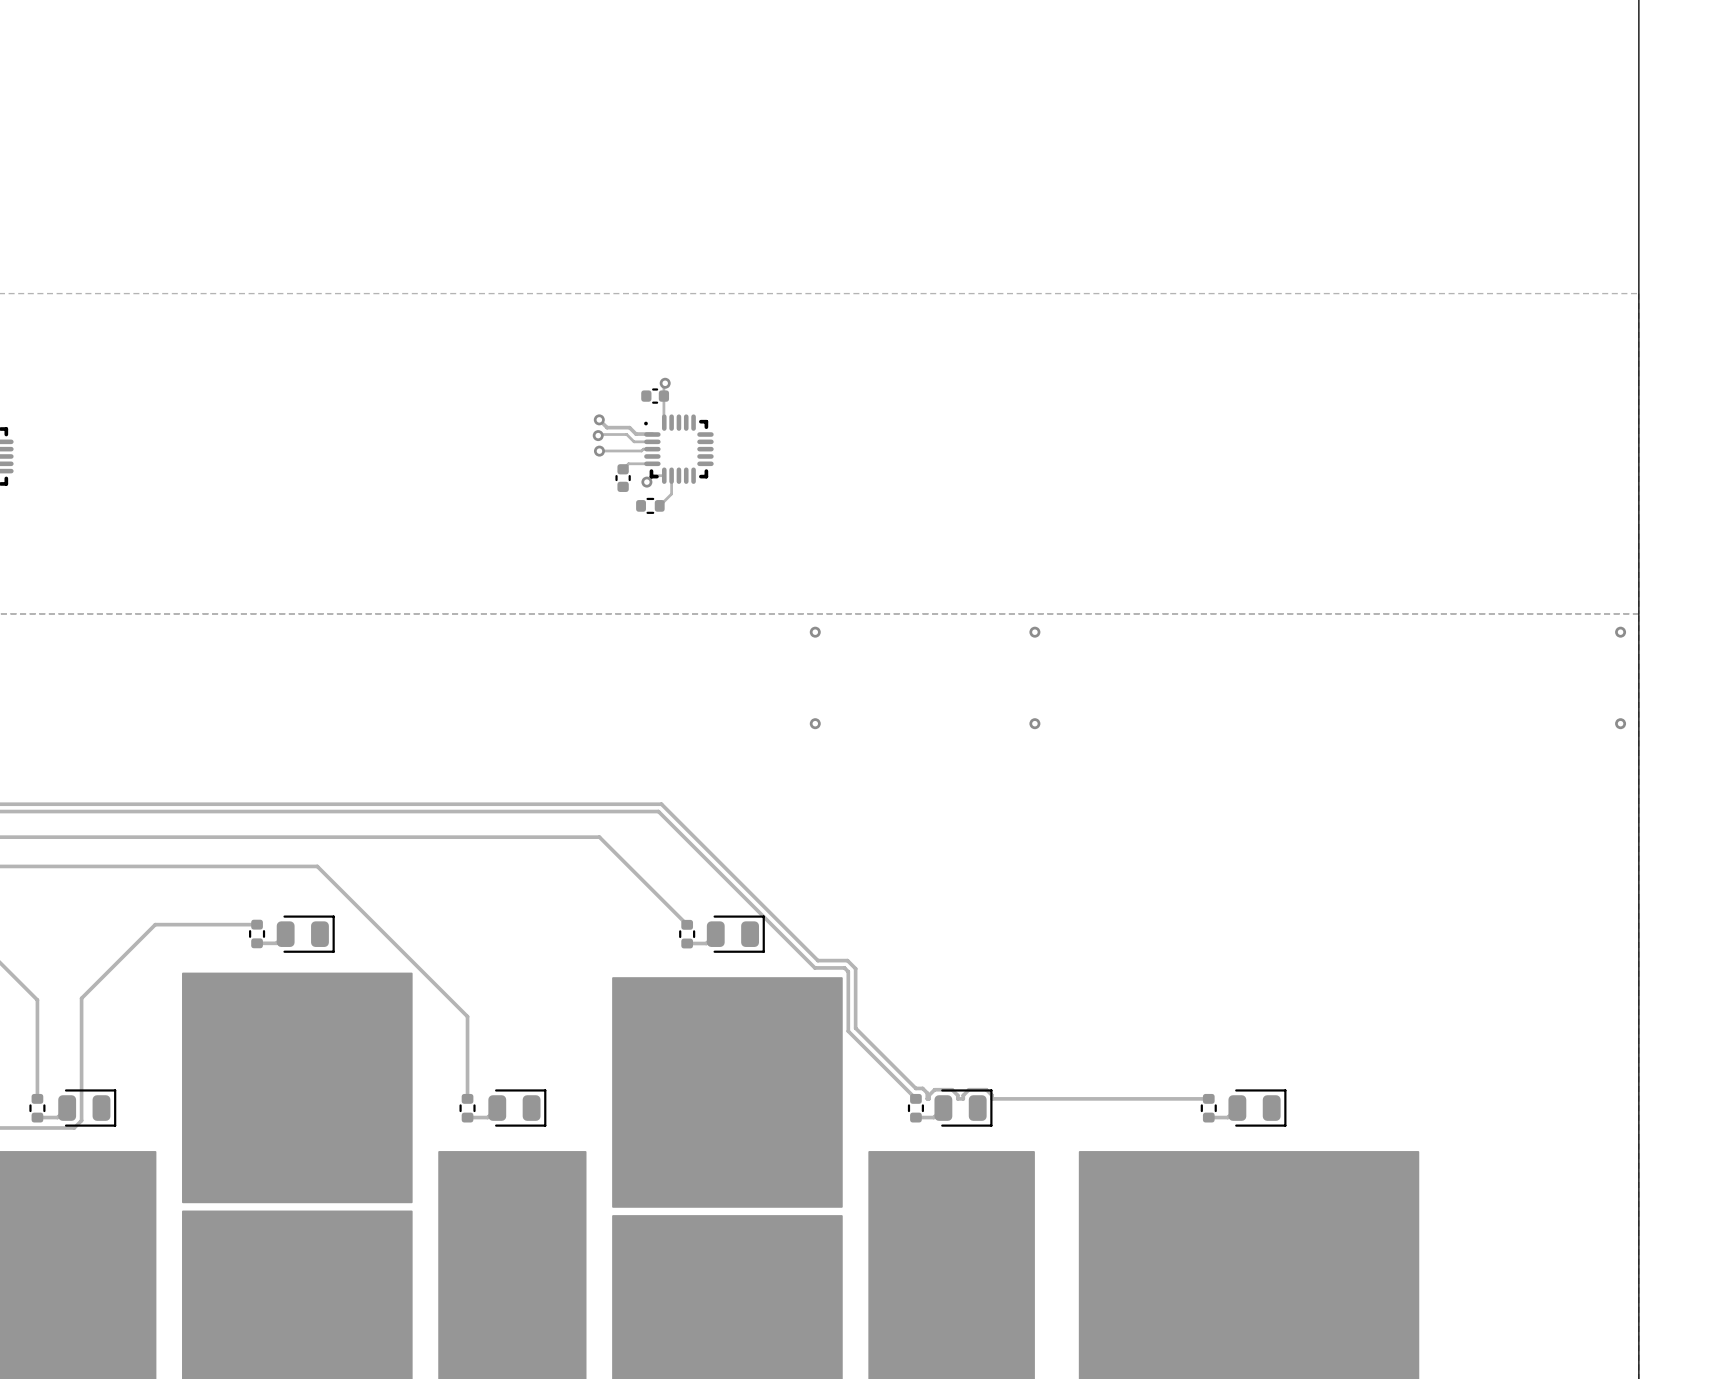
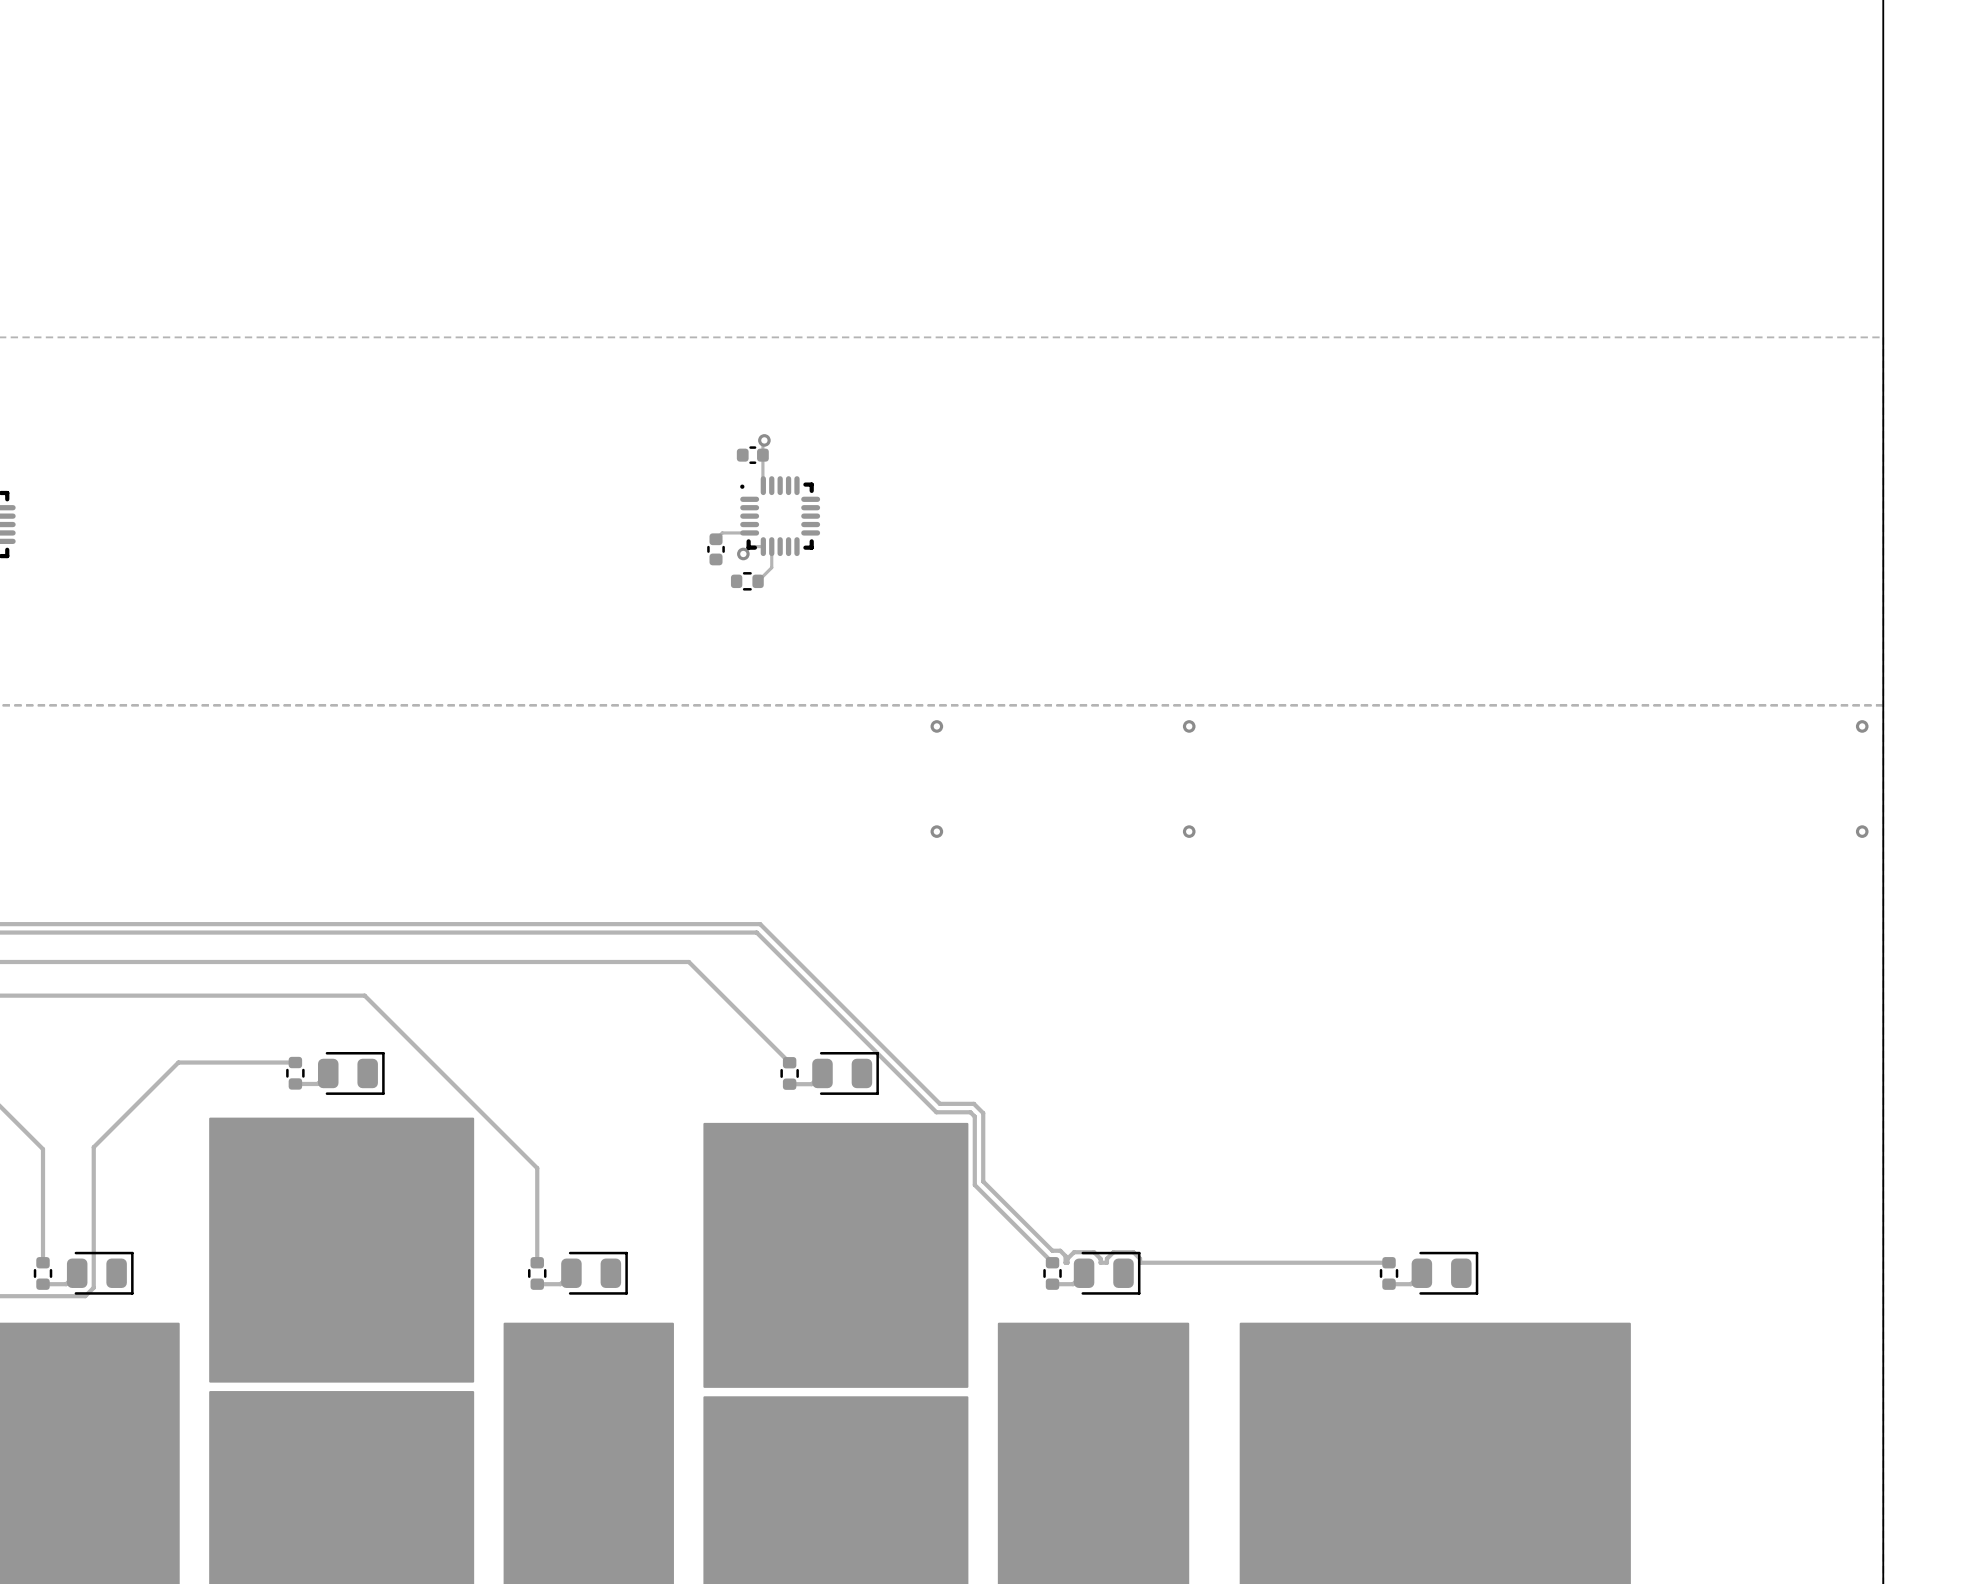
track: (599, 419) (607, 427) (629, 427) (636, 434) (652, 434) -> none
via: (599, 419) -> none
track: (598, 435) (626, 434) (634, 441) (652, 441) -> none
via: (598, 435) -> none
track: (652, 449) (599, 450) -> none
via: (599, 451) -> none

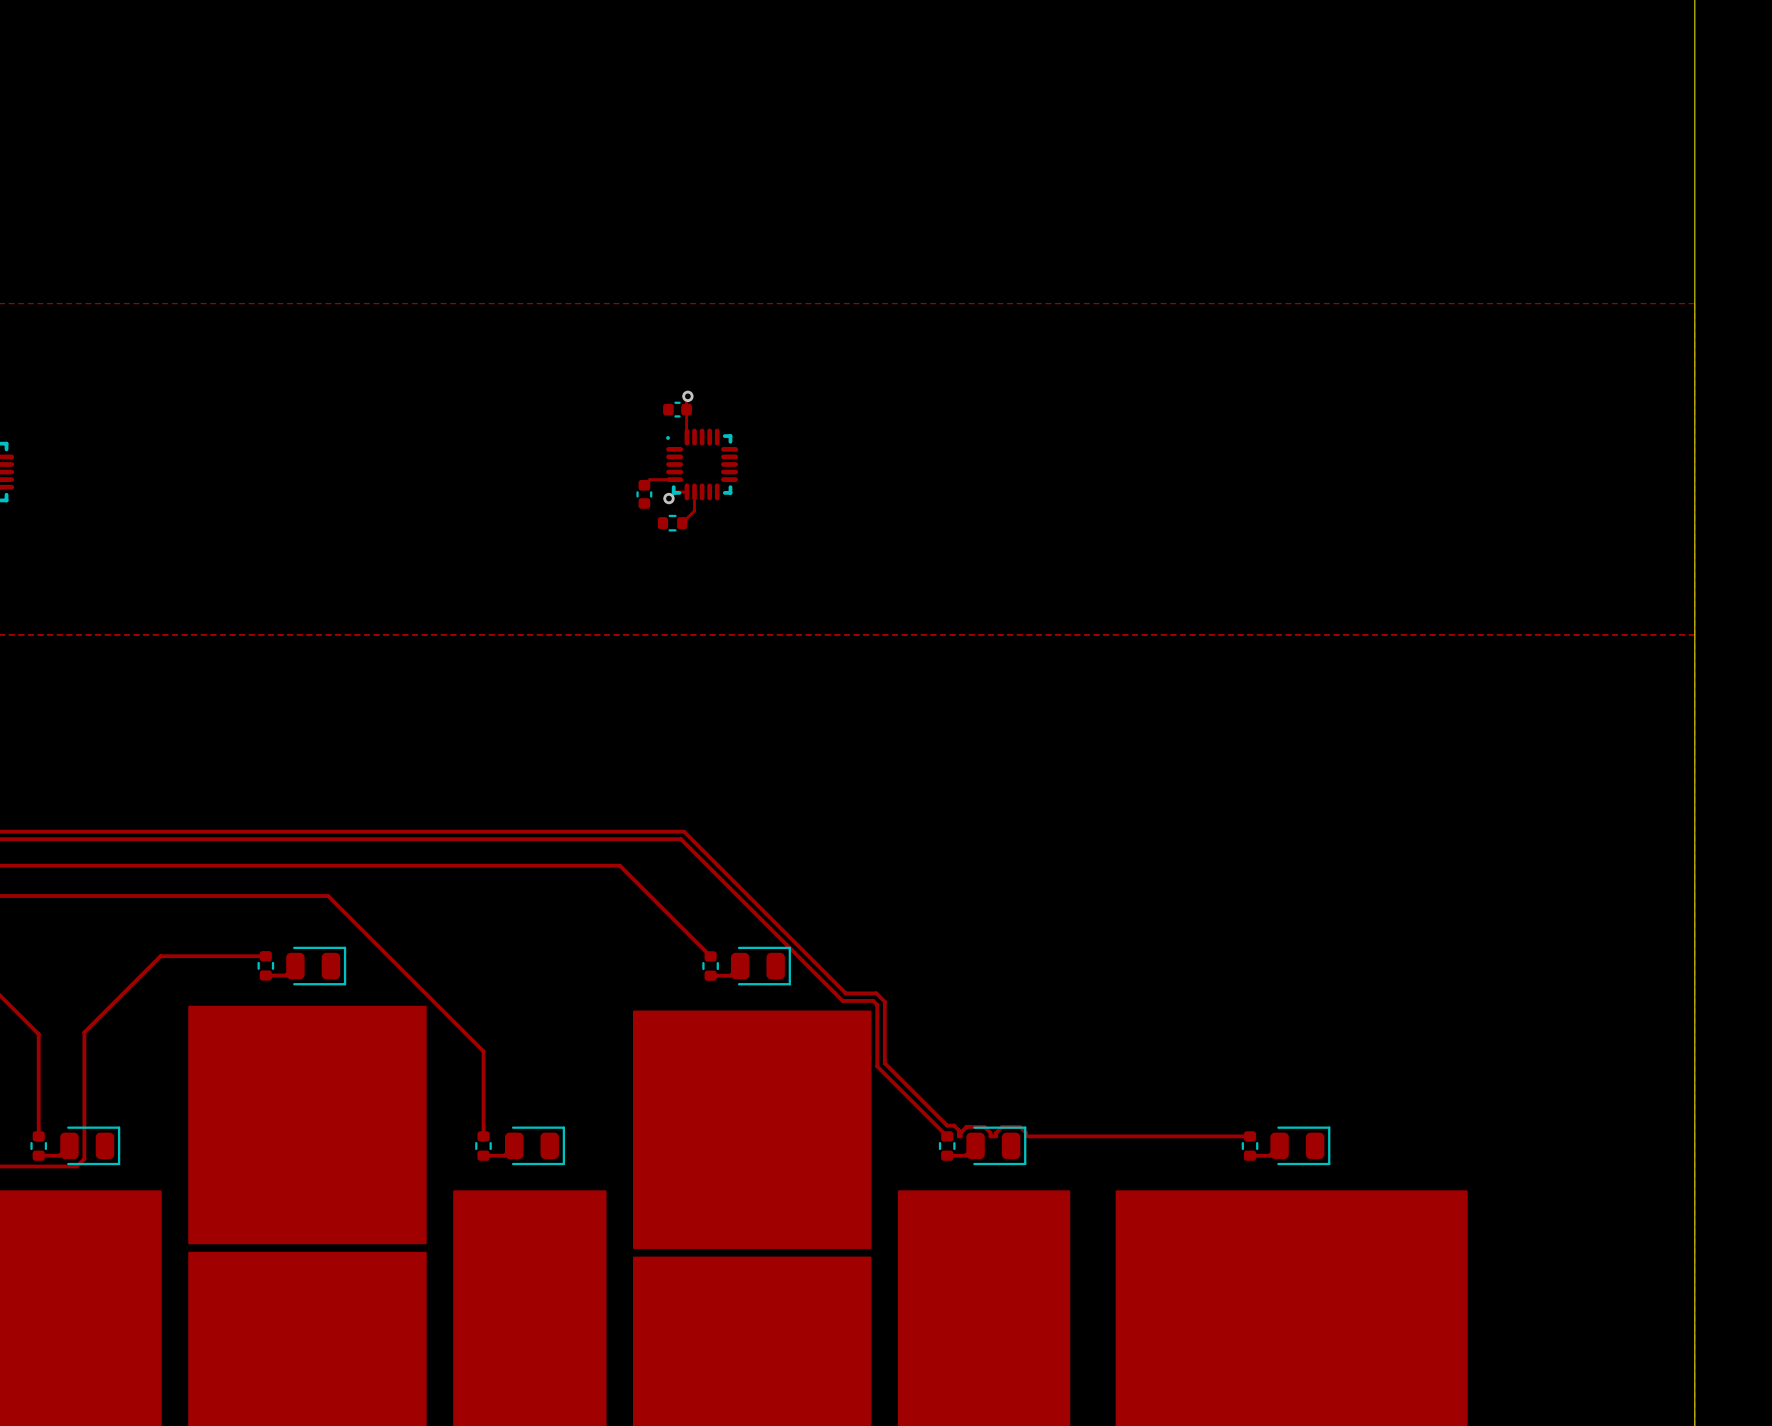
via: (936, 726) -> none
via: (1189, 726) -> none
via: (1862, 726) -> none
via: (936, 831) -> none
via: (1189, 831) -> none
via: (1862, 831) -> none

